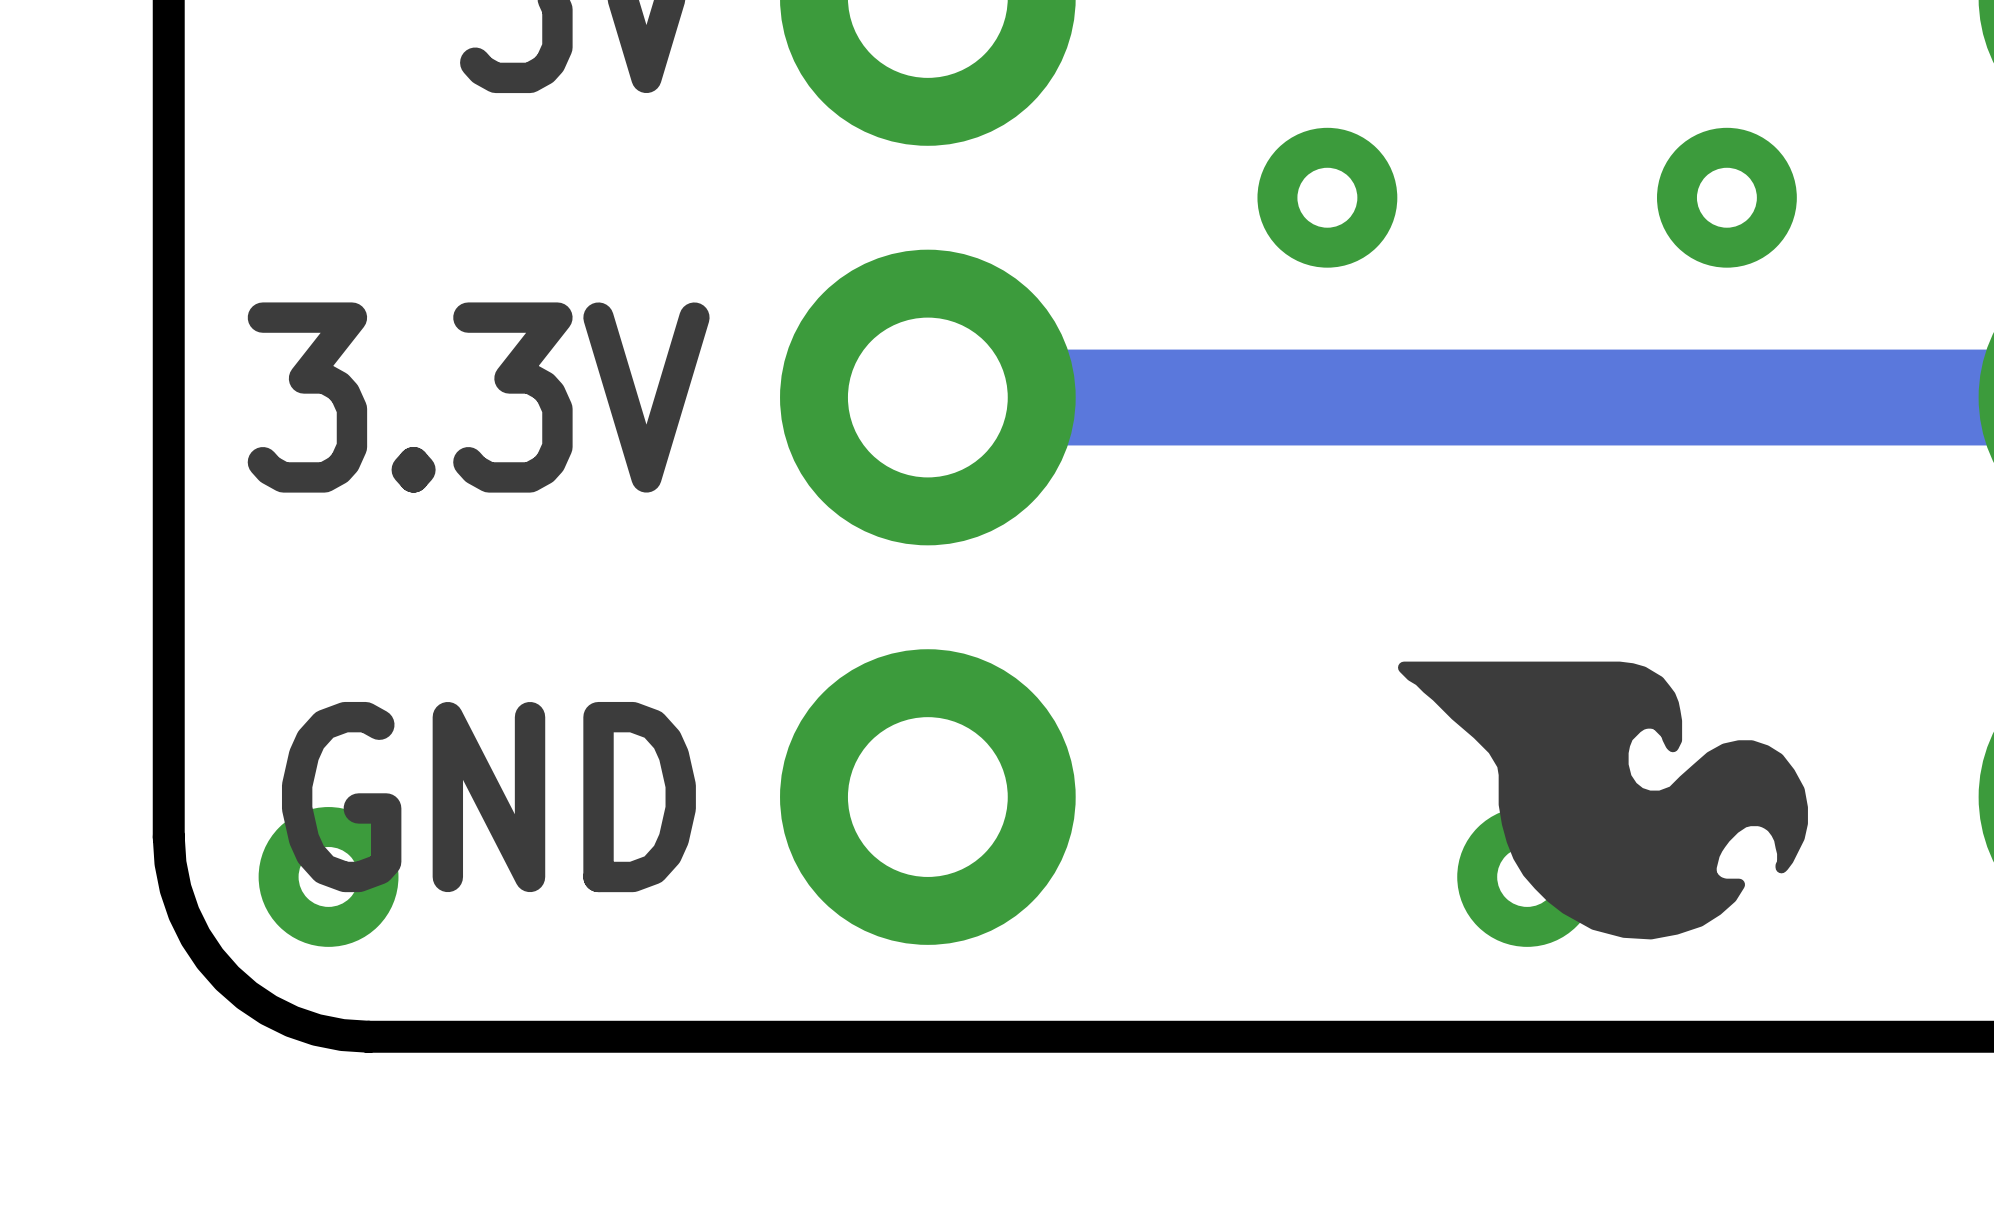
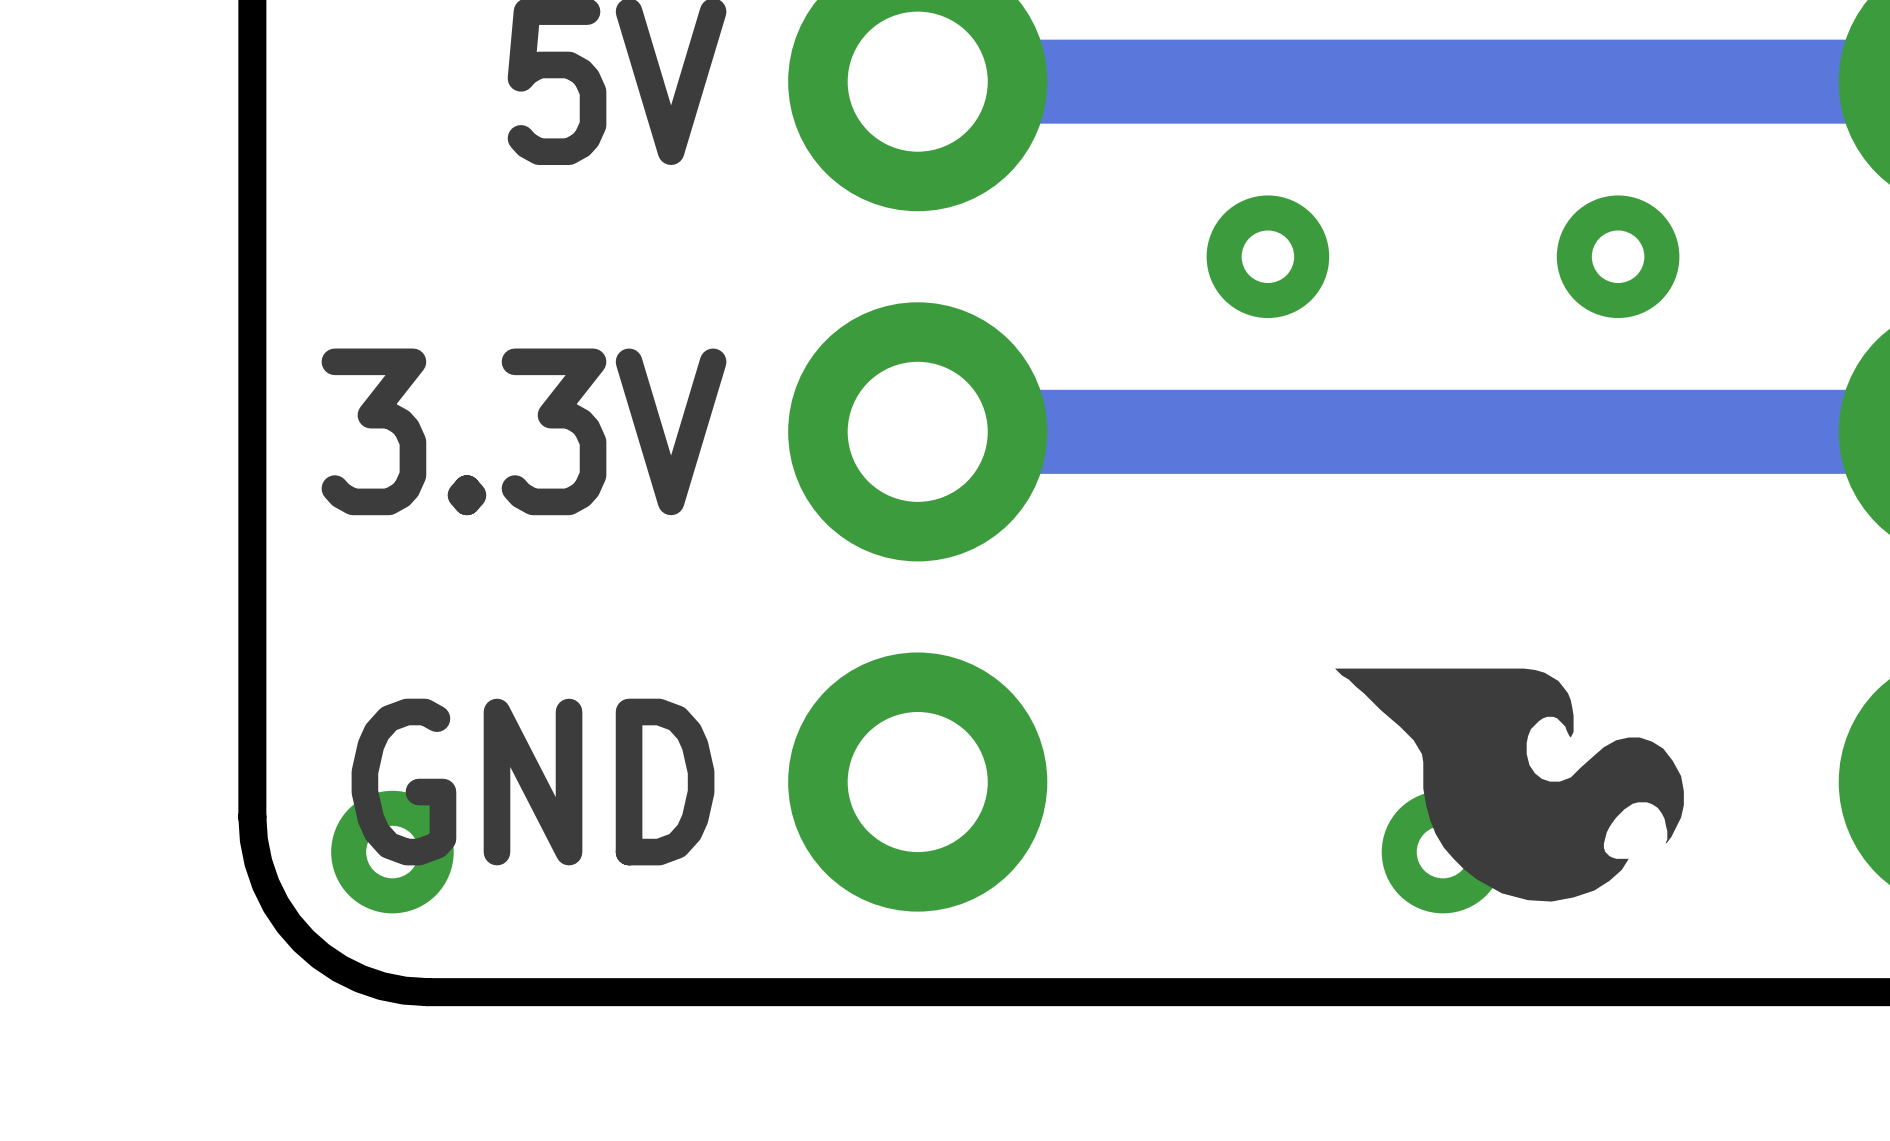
drawing shape: [1398, 661, 1808, 940] -> [1333, 668, 1684, 902]

